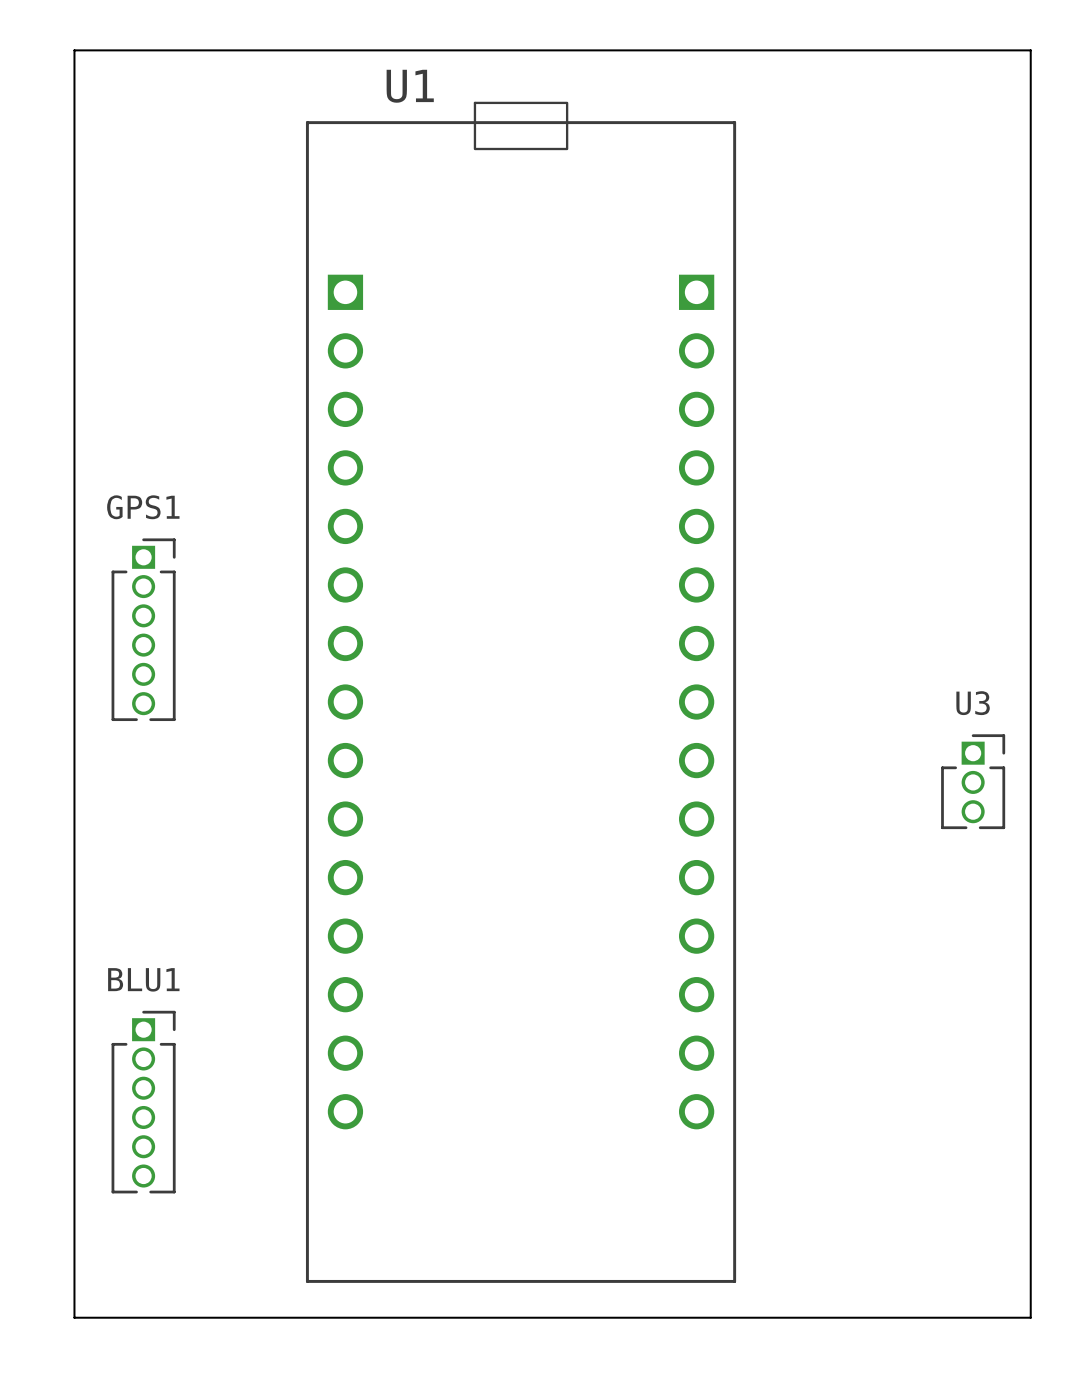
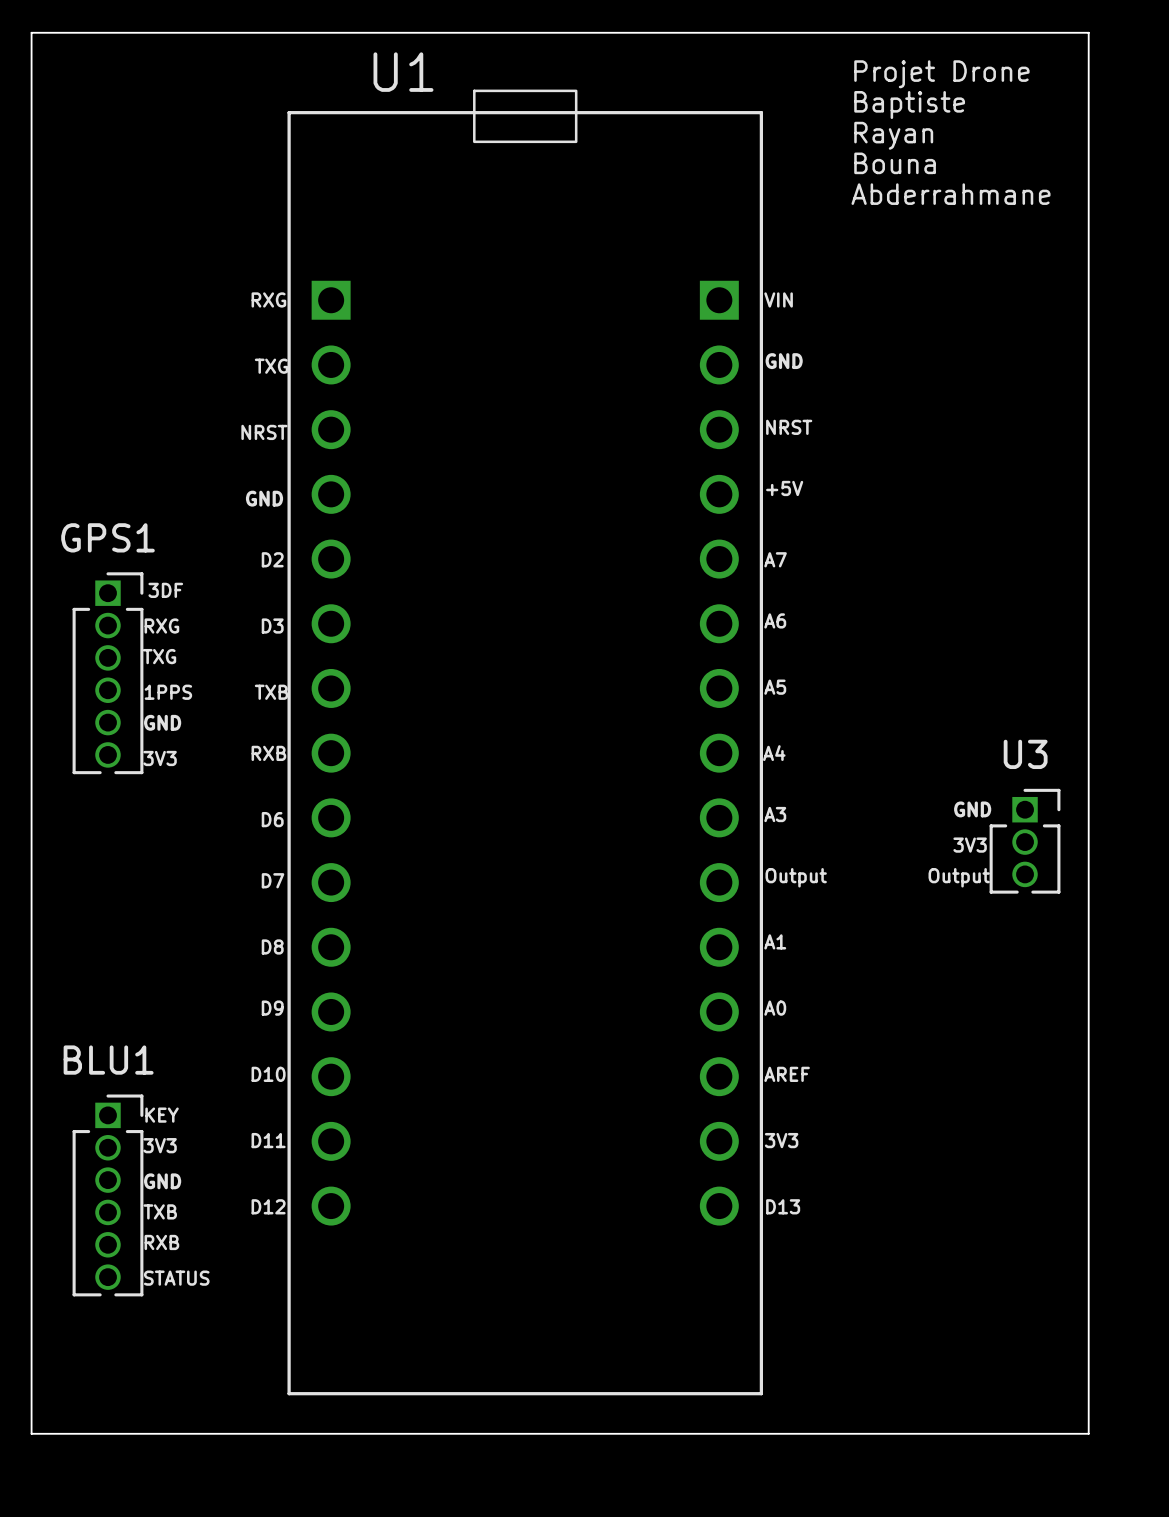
text: none -> Projet Drone (941, 74)
text: none -> Baptiste (909, 105)
text: none -> Rayan (893, 135)
text: none -> Bouna (895, 163)
text: none -> Abderrahmane (951, 194)
text: none -> RXG (268, 299)
text: none -> VIN (778, 299)
text: none -> GND (784, 361)
text: none -> TXG (271, 366)
text: none -> NRST (789, 427)
text: none -> NRST (264, 432)
text: none -> +5V (784, 488)
text: none -> GND (264, 498)
text: none -> D2 (272, 559)
text: none -> A7 (775, 559)
text: none -> 3DF (165, 590)
text: none -> A6 (775, 620)
text: none -> RXG (161, 626)
text: none -> D3 (272, 626)
text: none -> TXG (159, 656)
text: none -> A5 (775, 687)
text: none -> 1PPS (168, 692)
text: none -> TXB (271, 692)
text: none -> GND (162, 722)
text: none -> RXB (268, 753)
text: none -> A4 (774, 753)
text: none -> 3V3 (160, 758)
text: none -> GND (972, 809)
text: none -> A3 (775, 814)
text: none -> D6 (272, 819)
text: none -> 3V3 (970, 845)
text: none -> Output (796, 877)
text: none -> Output (959, 877)
text: none -> D7 (273, 880)
text: none -> A1 (775, 941)
text: none -> D8 (272, 946)
text: none -> D9 (272, 1008)
text: none -> A0 (775, 1008)
text: none -> D10 (268, 1074)
text: none -> AREF (787, 1074)
text: none -> KEY (162, 1115)
text: none -> D11 (268, 1140)
text: none -> 3V3 (781, 1140)
text: none -> 3V3 (160, 1145)
text: none -> GND (162, 1181)
text: none -> D12 (268, 1206)
text: none -> D13 (783, 1206)
text: none -> TXB (160, 1211)
text: none -> RXB (161, 1242)
text: none -> STATUS (176, 1278)

